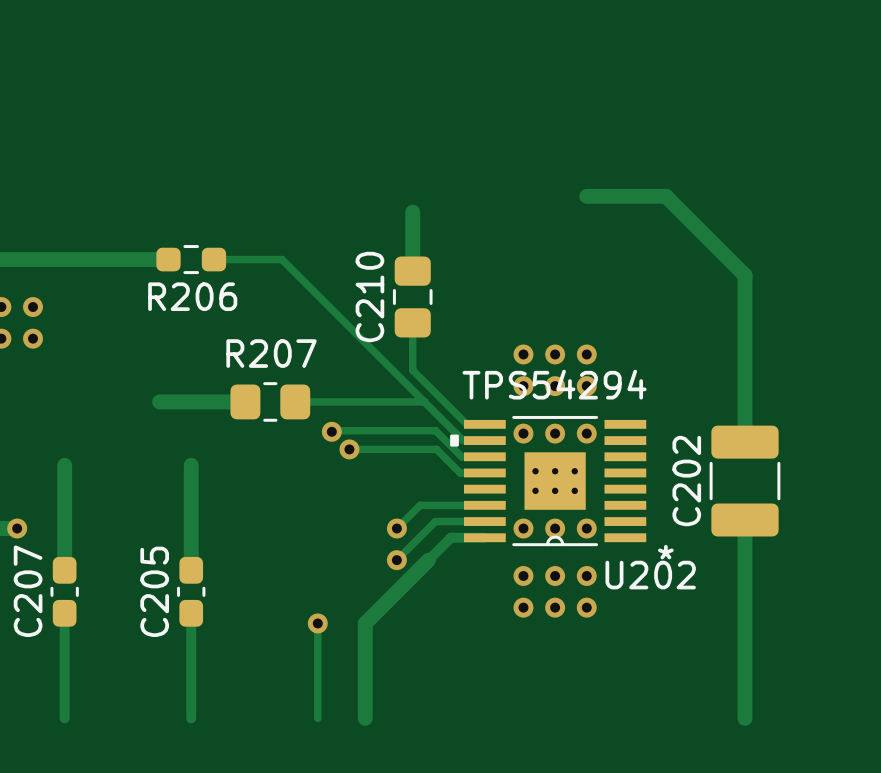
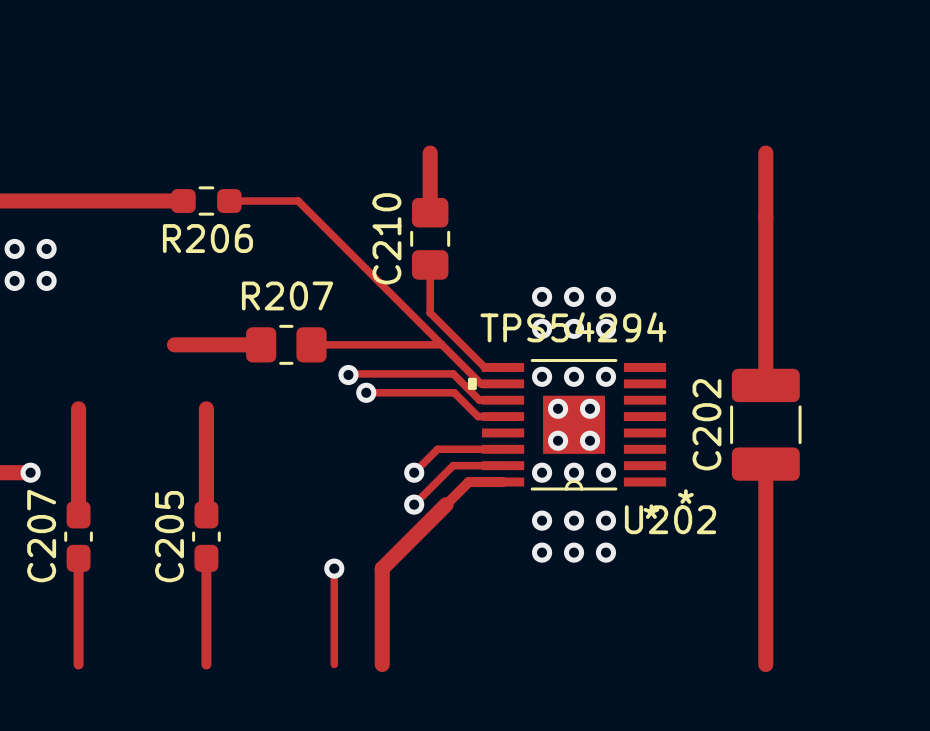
track: (586, 196) (665, 196) (744, 275) -> (765, 153) (765, 216)
U202 footprint: [450, 415, 647, 547] -> [467, 359, 667, 491]
via: none -> (558, 408)
via: none -> (590, 408)
via: none -> (558, 440)
via: none -> (590, 440)

